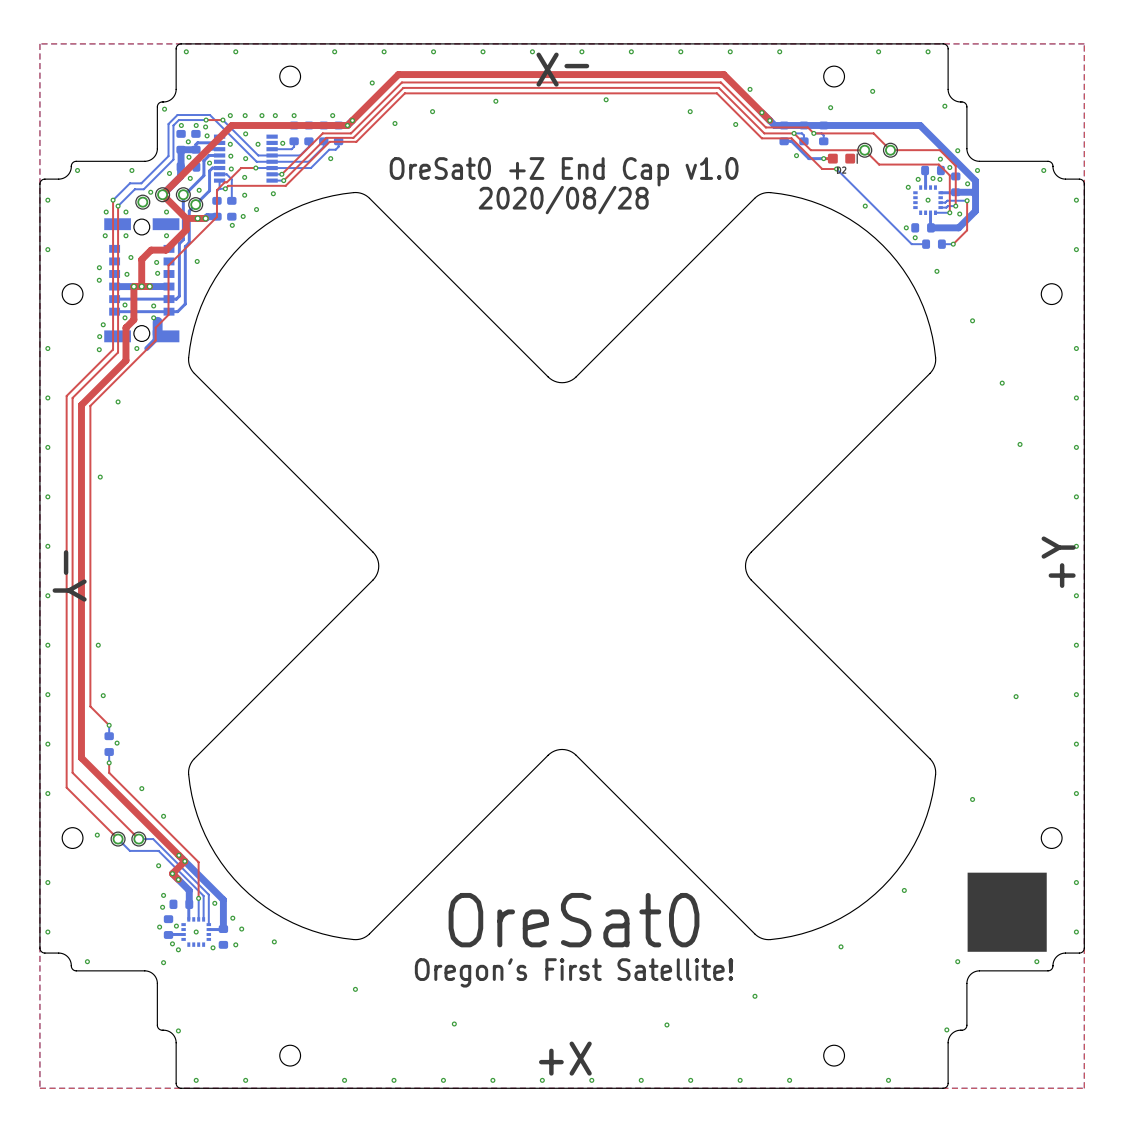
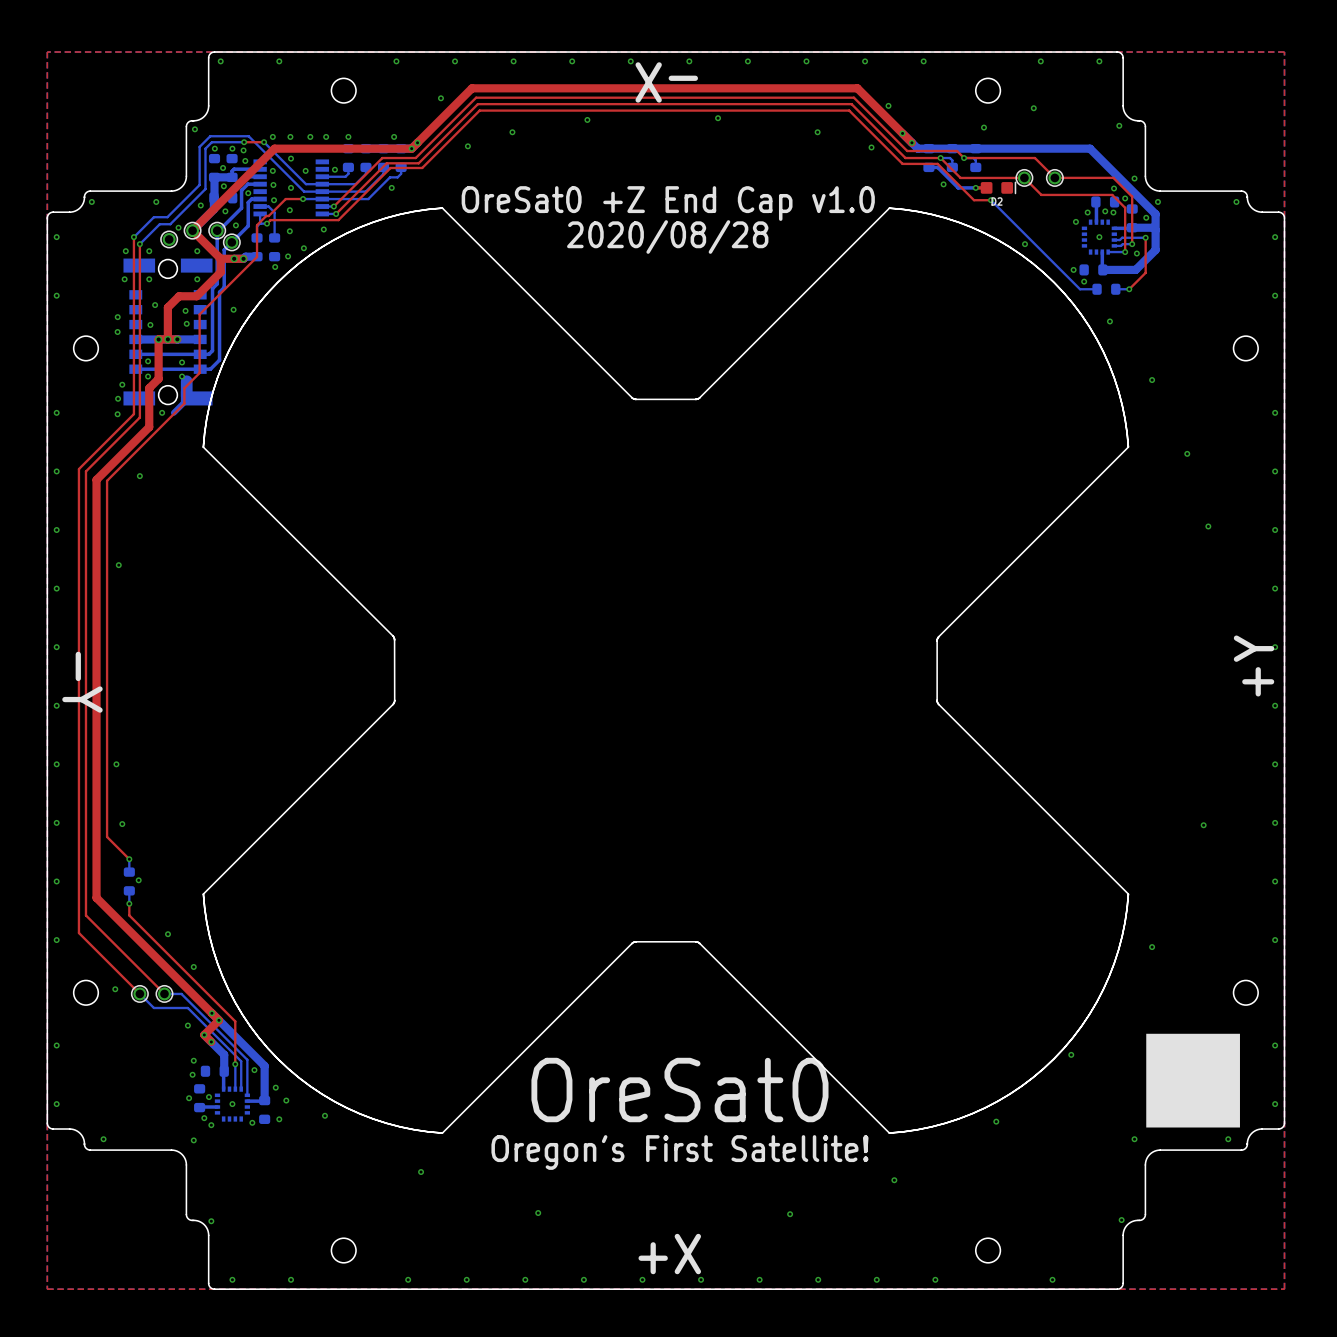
board edge: none -> (442, 208) (631, 397)
board edge: none -> (442, 208) (400, 214) (359, 227) (334, 239) (310, 254) (277, 282) (250, 314) (228, 351) (217, 377) (209, 405) (203, 447)
board edge: none -> (442, 208) (400, 214) (359, 227) (334, 239) (310, 254) (277, 282) (250, 314) (228, 351) (217, 377) (209, 405) (203, 447)
board edge: none -> (889, 208) (699, 397)
board edge: none -> (889, 208) (917, 211) (945, 217) (984, 233) (1021, 255) (1054, 282) (1081, 314) (1103, 351) (1114, 377) (1122, 405) (1128, 447)
board edge: none -> (889, 208) (917, 211) (945, 217) (984, 233) (1021, 255) (1054, 282) (1081, 314) (1103, 351) (1114, 377) (1122, 405) (1128, 447)
board edge: (353, 192) (362, 193) (369, 198) (548, 376) (559, 382) (569, 381) (576, 376) (754, 198) (762, 193) (770, 192) (801, 198) (840, 213) (875, 238) (903, 269) (919, 296) (926, 316) (934, 347) (935, 359) (933, 368) (751, 552) (745, 563) (747, 573) (751, 580) (929, 758) (934, 765) (935, 774) (929, 805) (914, 844) (890, 879) (858, 907) (840, 918) (811, 930) (781, 938) (768, 939) (760, 937) (576, 755) (564, 749) (554, 750) (548, 755) (369, 933) (362, 938) (353, 939) (322, 933) (283, 918) (249, 894) (221, 862) (210, 844) (197, 815) (189, 784) (188, 772) (190, 763) (372, 580) (377, 573) (378, 566) (377, 558) (372, 552) (192, 371) (188, 359) (191, 336) (201, 306) (215, 278) (234, 253) (249, 238) (274, 219) (302, 204) (322, 198) (353, 192) -> none
board edge: none -> (631, 397) (636, 399)
board edge: none -> (631, 397) (636, 399)
board edge: none -> (699, 397) (695, 399)
board edge: none -> (699, 397) (695, 399)
board edge: none -> (636, 399) (695, 399)
board edge: none -> (203, 447) (392, 635)
board edge: none -> (1128, 447) (938, 636)
board edge: none -> (392, 635) (394, 639)
board edge: none -> (392, 635) (394, 639)
board edge: none -> (938, 636) (937, 640)
board edge: none -> (938, 636) (937, 640)
board edge: none -> (394, 639) (394, 700)
board edge: none -> (937, 640) (937, 700)
board edge: none -> (394, 700) (392, 704)
board edge: none -> (394, 700) (392, 704)
board edge: none -> (937, 700) (938, 704)
board edge: none -> (937, 700) (938, 704)
board edge: none -> (392, 704) (203, 894)
board edge: none -> (938, 704) (1128, 894)
board edge: none -> (203, 894) (209, 936) (222, 976) (235, 1002) (250, 1026) (277, 1058) (310, 1086) (334, 1101) (359, 1113) (400, 1126) (442, 1133)
board edge: none -> (203, 894) (209, 936) (222, 976) (235, 1002) (250, 1026) (277, 1058) (310, 1086) (334, 1101) (359, 1113) (400, 1126) (442, 1133)
board edge: none -> (1128, 894) (1122, 936) (1109, 976) (1096, 1002) (1081, 1026) (1054, 1058) (1021, 1086) (997, 1101) (972, 1113) (931, 1126) (889, 1133)
board edge: none -> (1128, 894) (1122, 936) (1109, 976) (1096, 1002) (1081, 1026) (1054, 1058) (1021, 1086) (997, 1101) (972, 1113) (931, 1126) (889, 1133)
board edge: none -> (636, 941) (695, 941)
board edge: none -> (636, 941) (631, 943)
board edge: none -> (636, 941) (631, 943)
board edge: none -> (695, 941) (699, 943)
board edge: none -> (695, 941) (699, 943)
board edge: none -> (631, 943) (442, 1133)
board edge: none -> (699, 943) (889, 1133)

